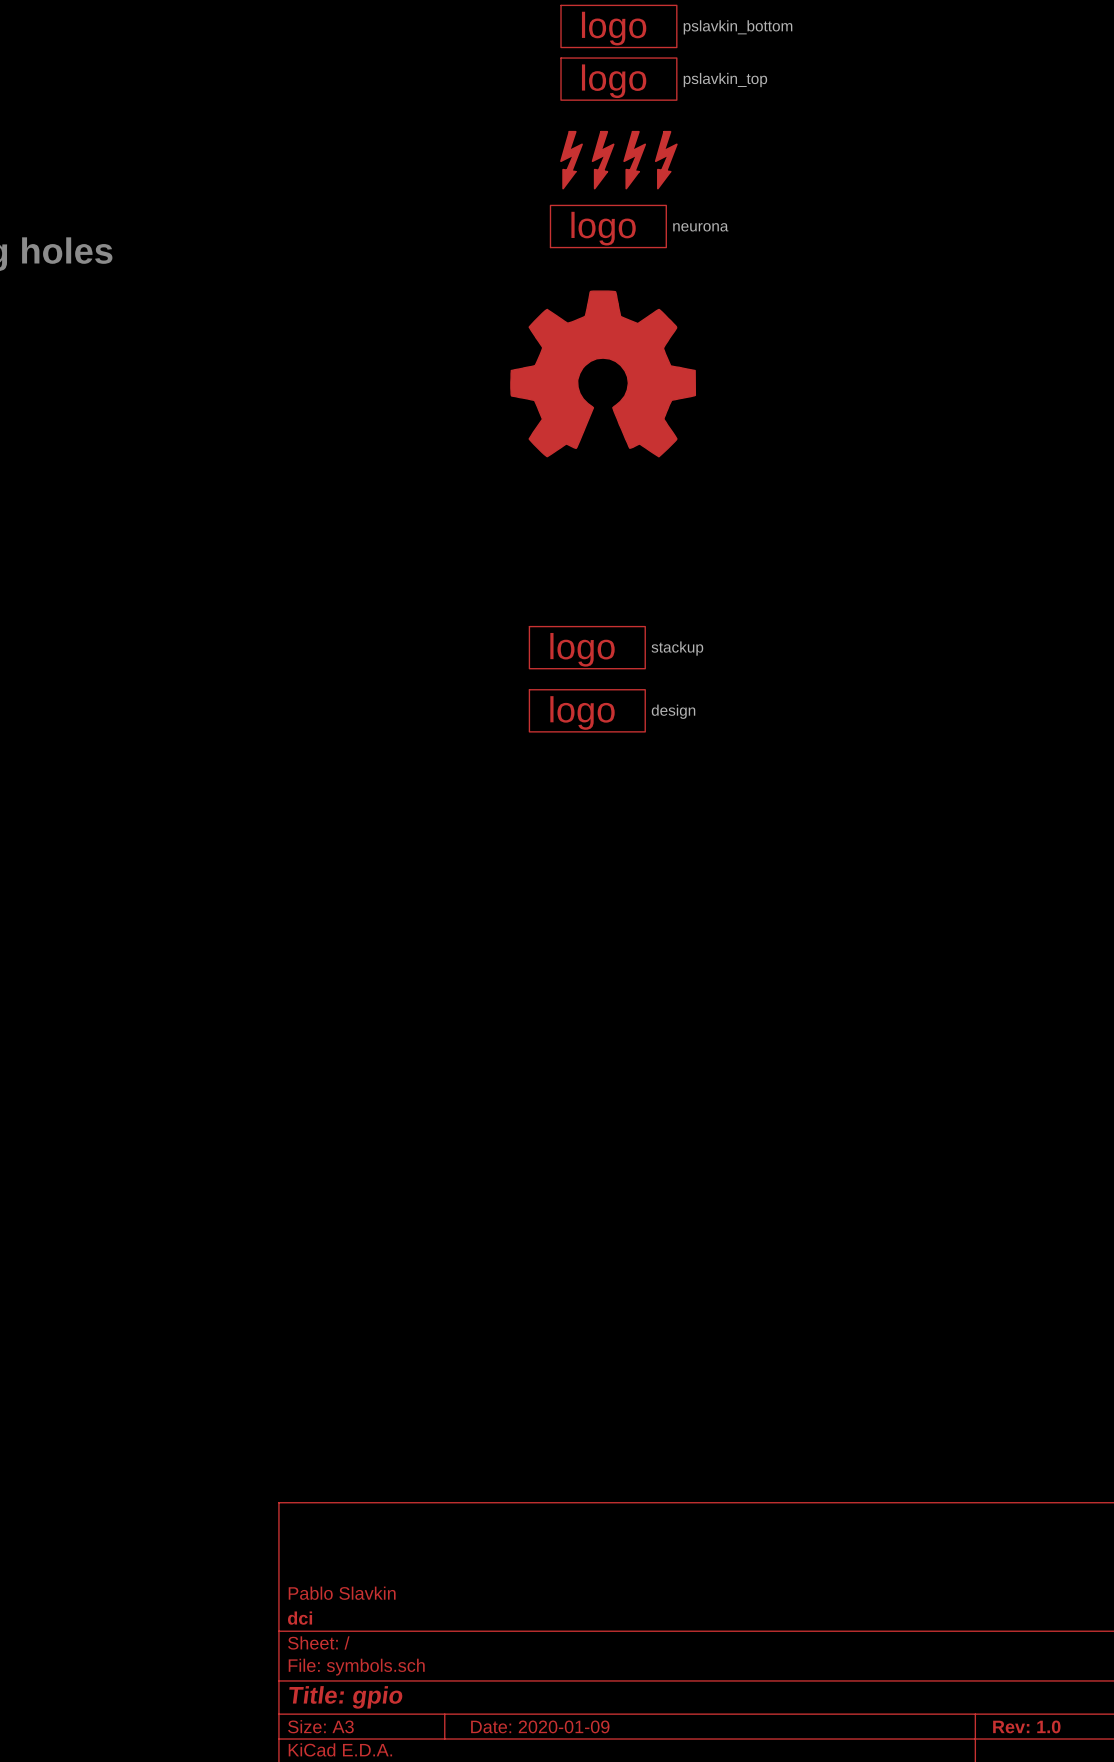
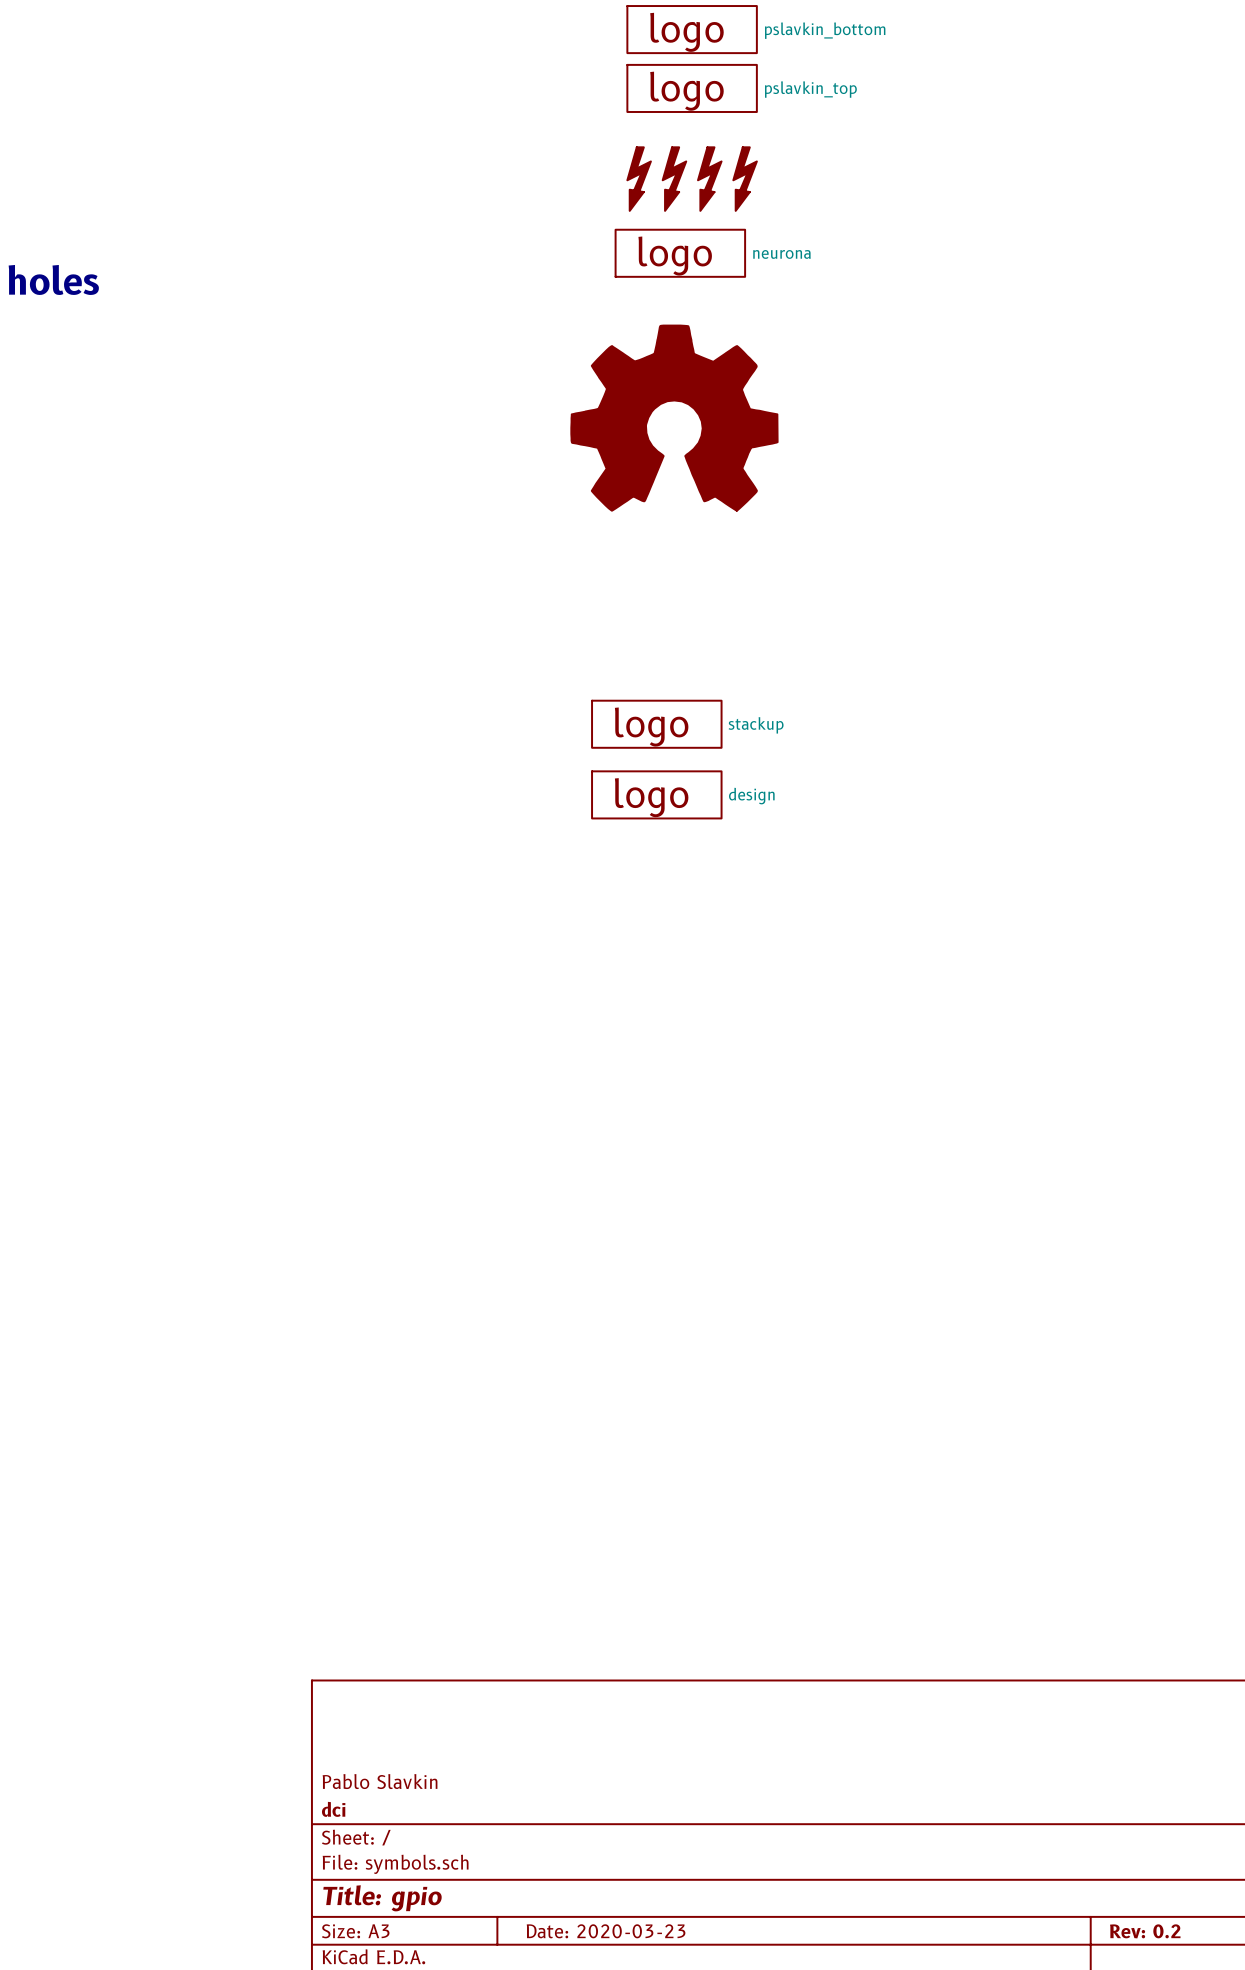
title block: Date: 2020-01-09 (540, 1726) -> Date: 2020-03-23 (606, 1931)
title block: Rev: 1.0 (1026, 1726) -> Rev: 0.2 (1145, 1931)

